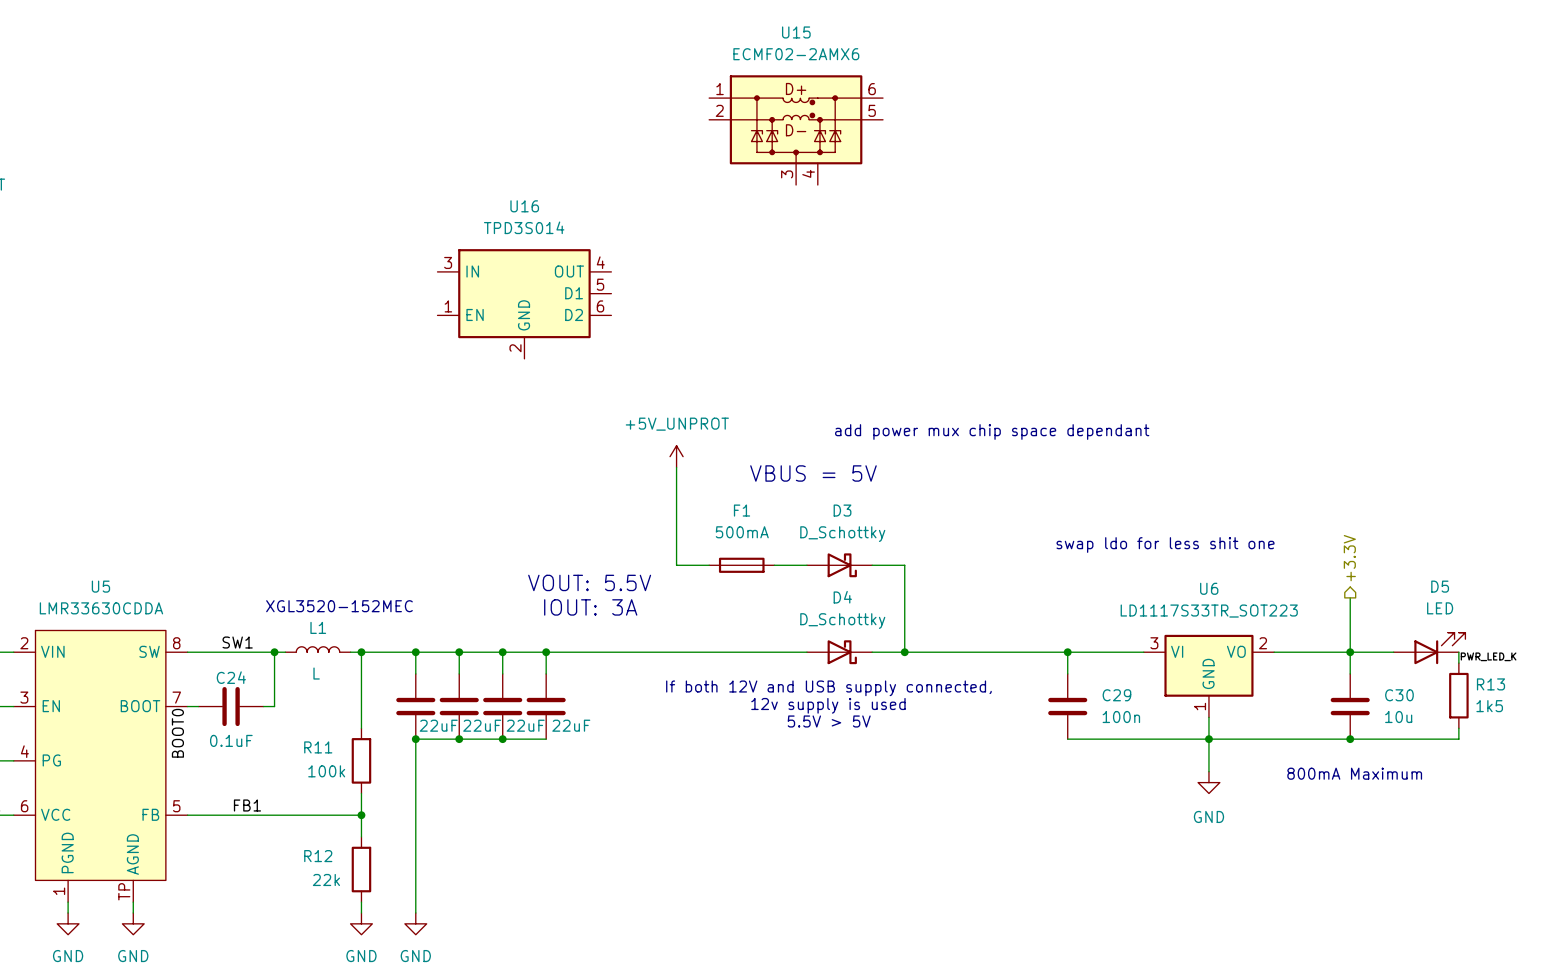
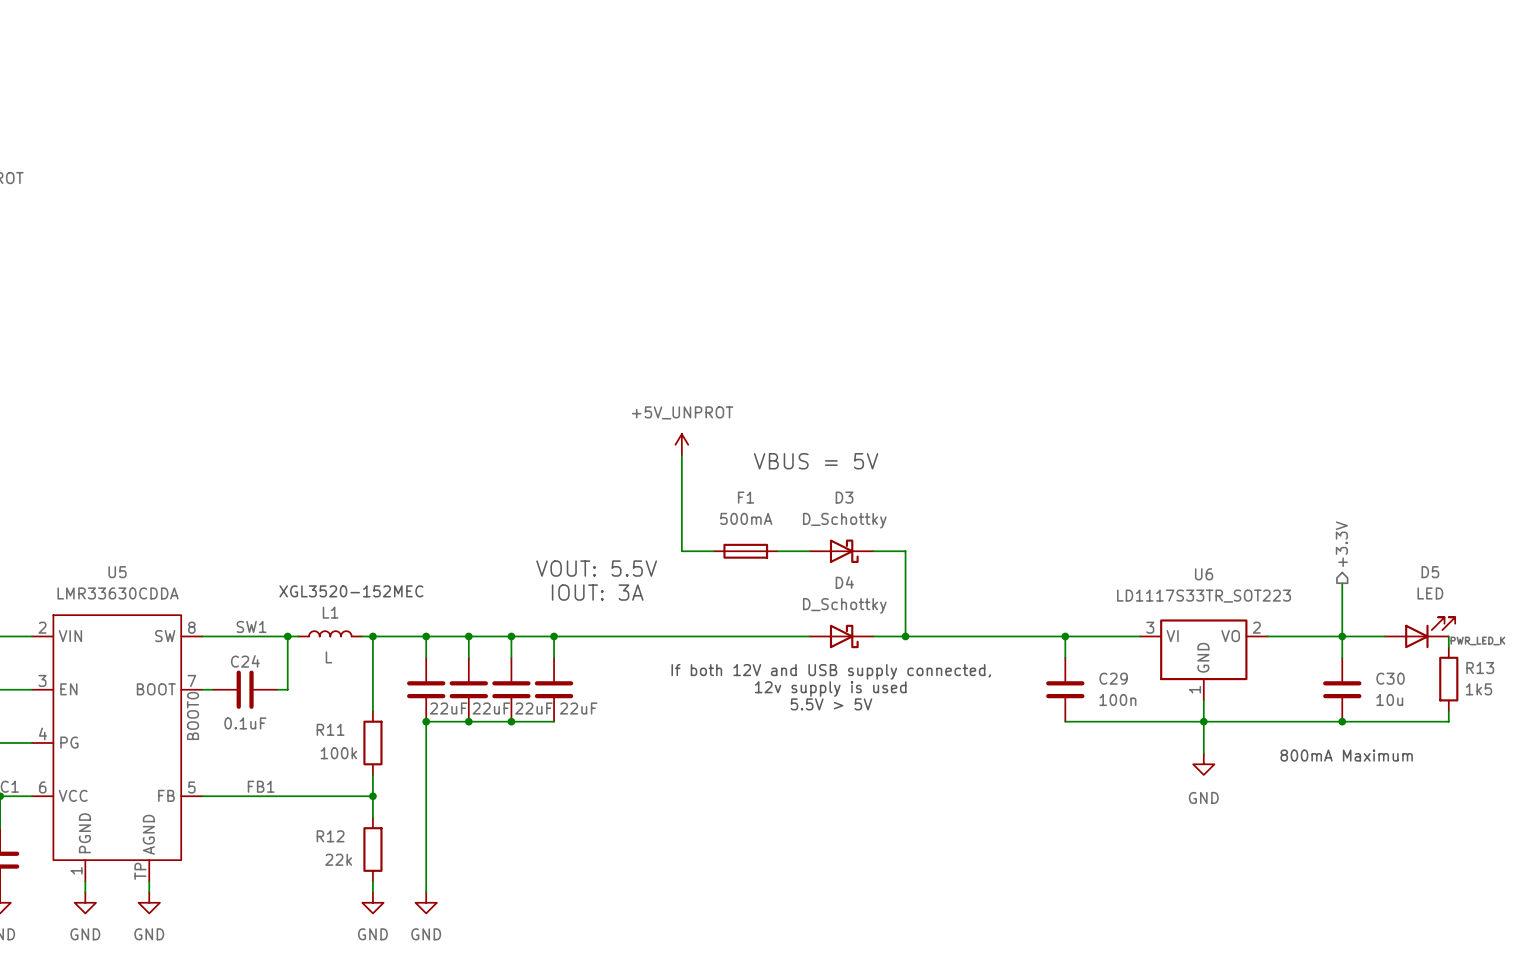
U15: ECMF02-2AMX6 (796, 130) -> none
U16: TPD3S014 (524, 303) -> none
text: add power mux chip space dependant (992, 432) -> none
text: swap ldo for less shit one (1165, 545) -> none

